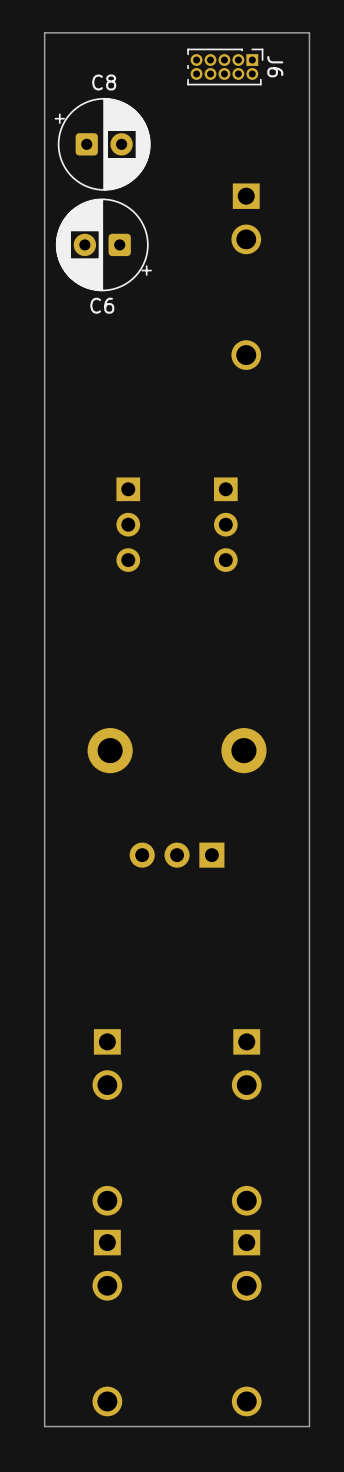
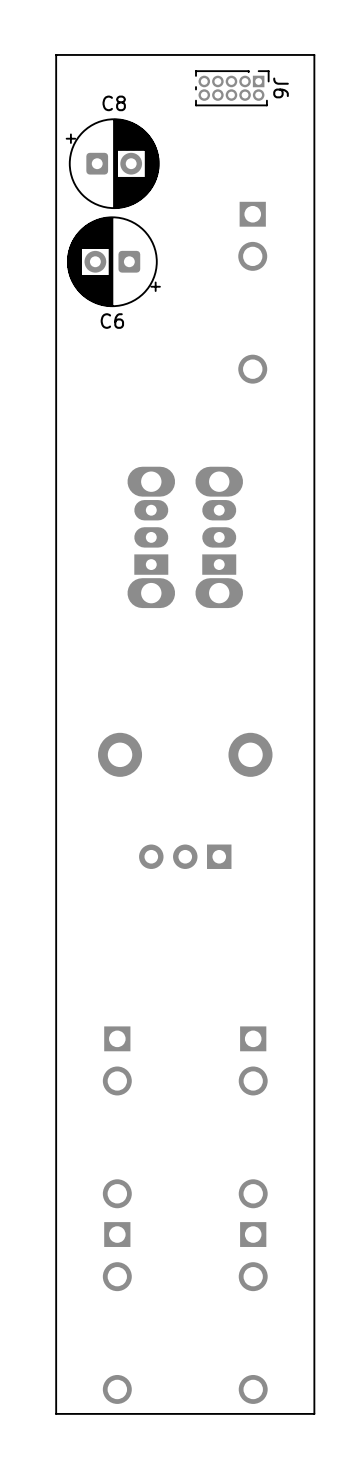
part: (128, 524) -> none
part: (225, 524) -> none
part: none -> (151, 537)
part: none -> (219, 537)

